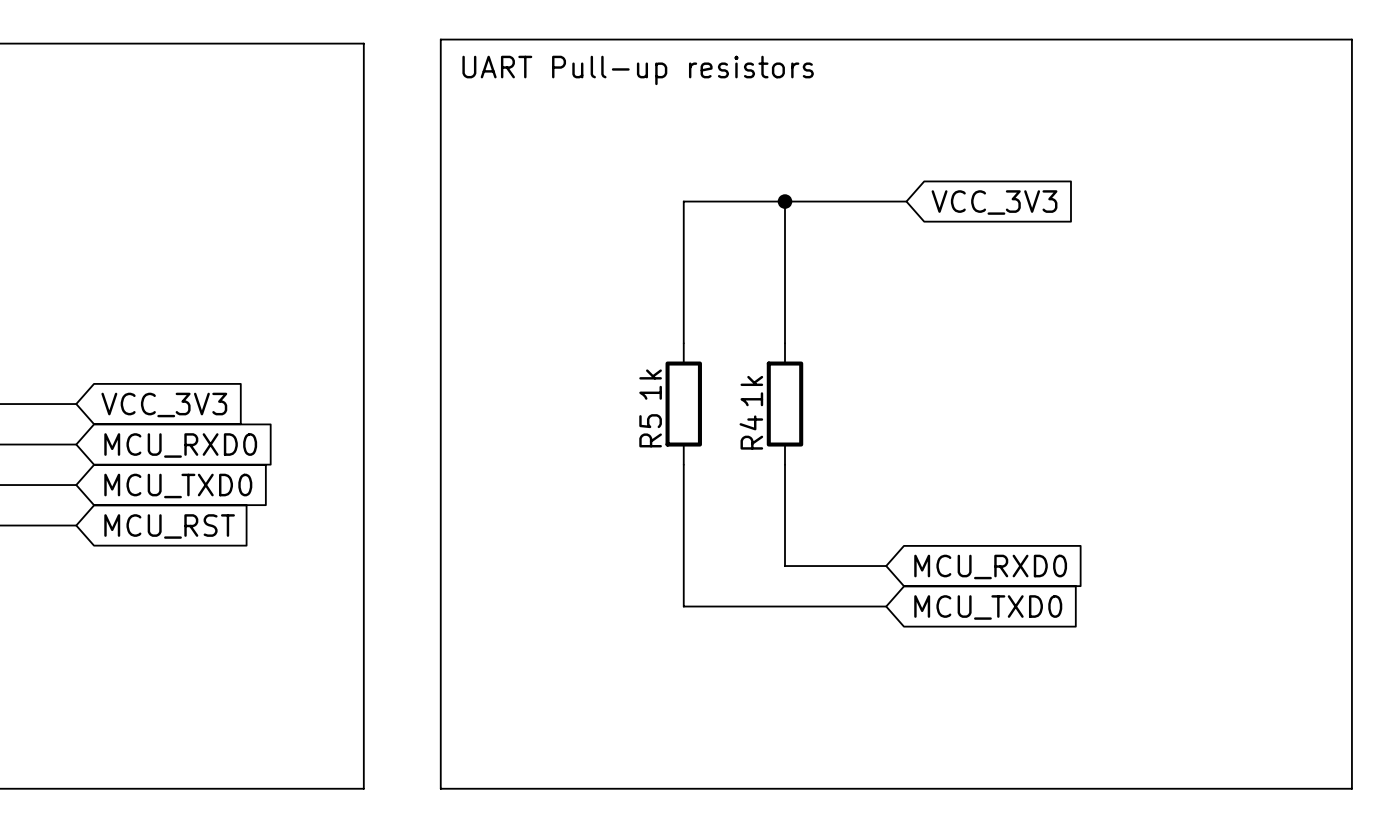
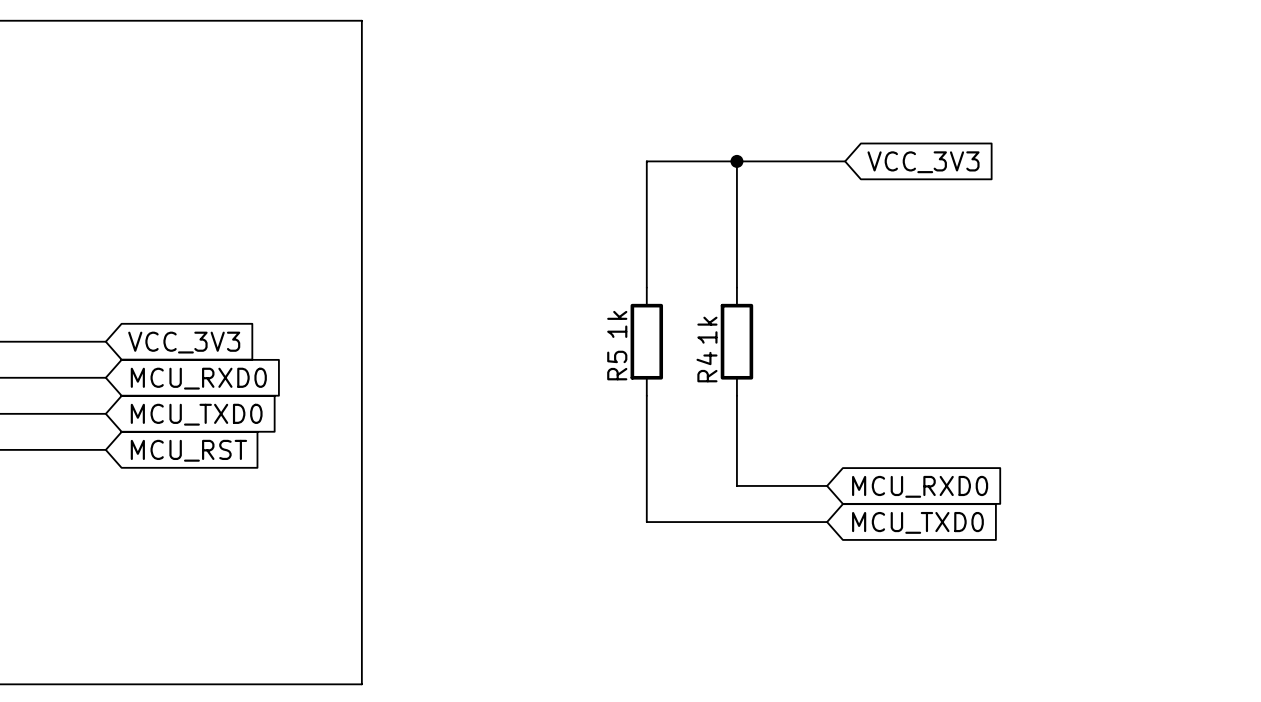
line: (440, 39) (1351, 39) (1351, 788) (440, 788) (440, 39) -> none
text: UART Pull-up resistors (638, 70) -> none

